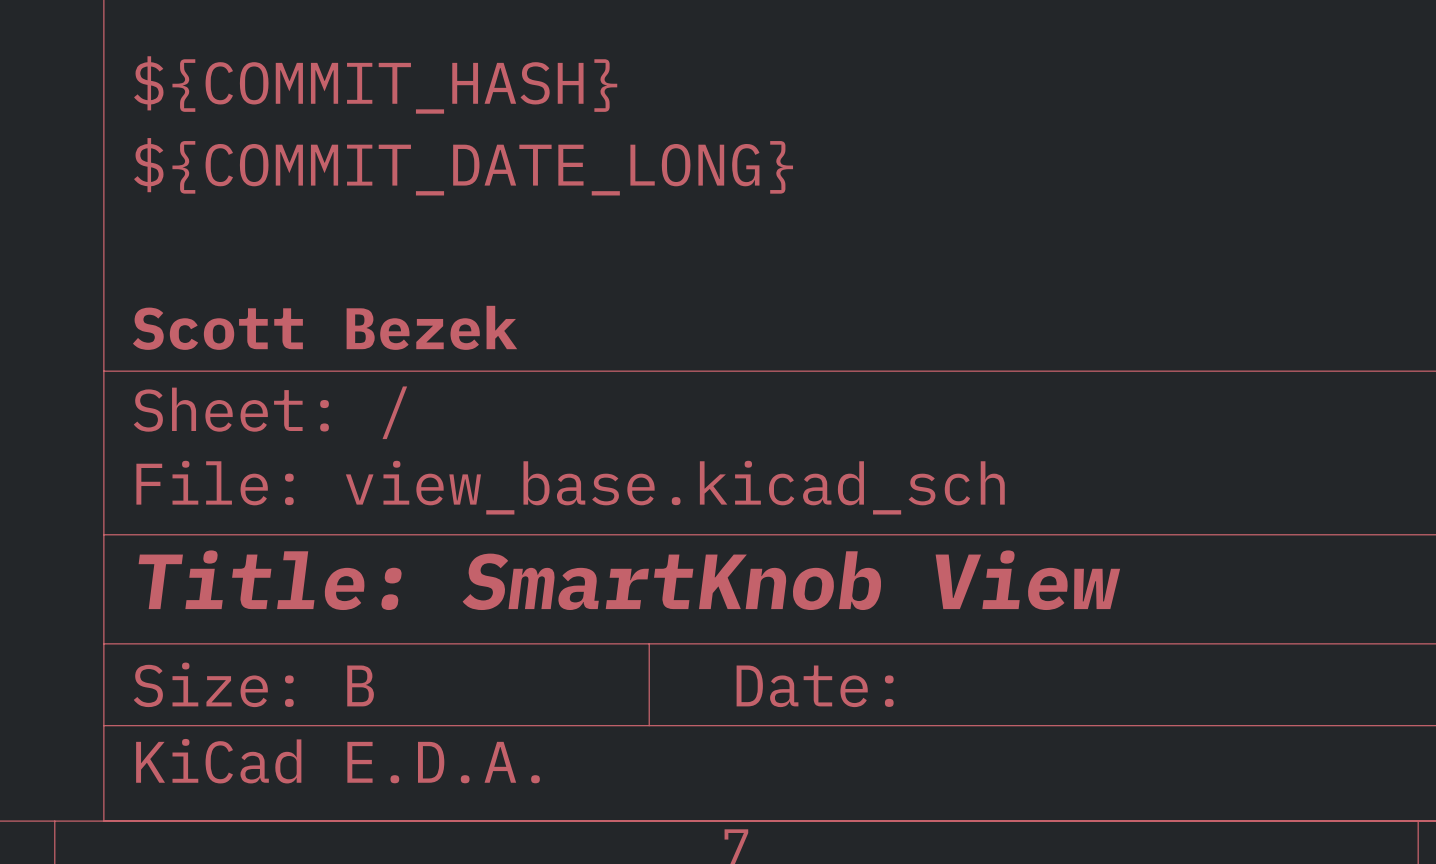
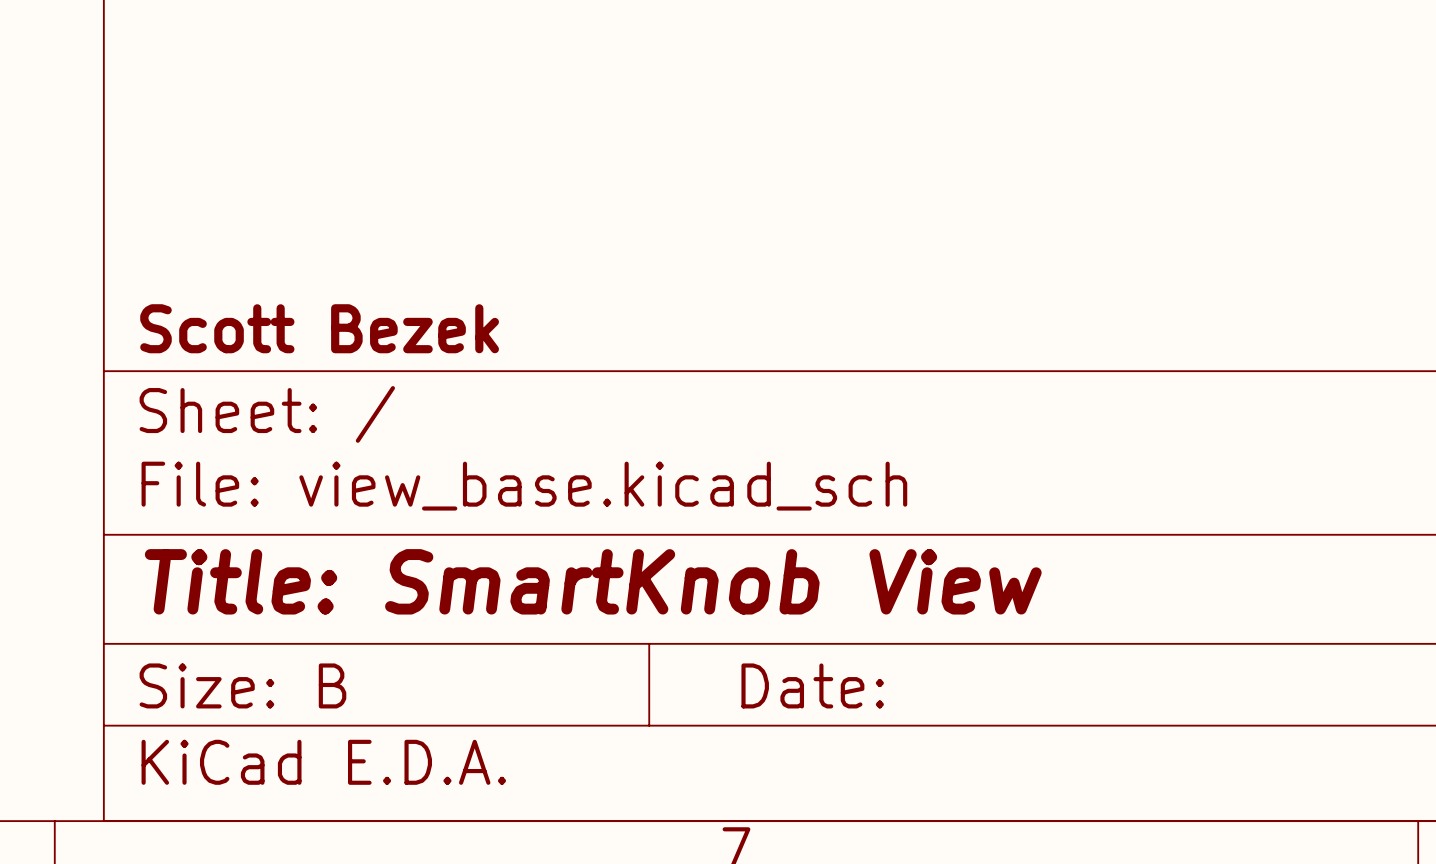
title block: ${COMMIT_HASH} (375, 84) -> none
title block: ${COMMIT_DATE_LONG} (463, 166) -> none

